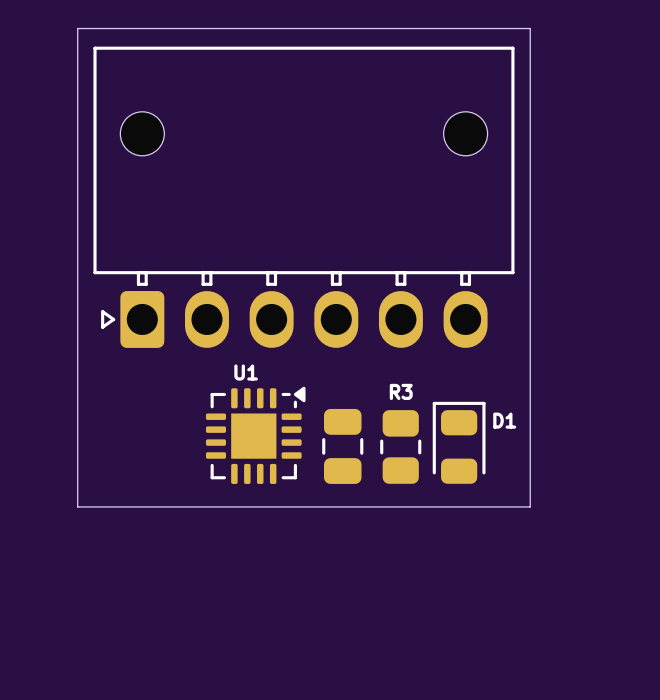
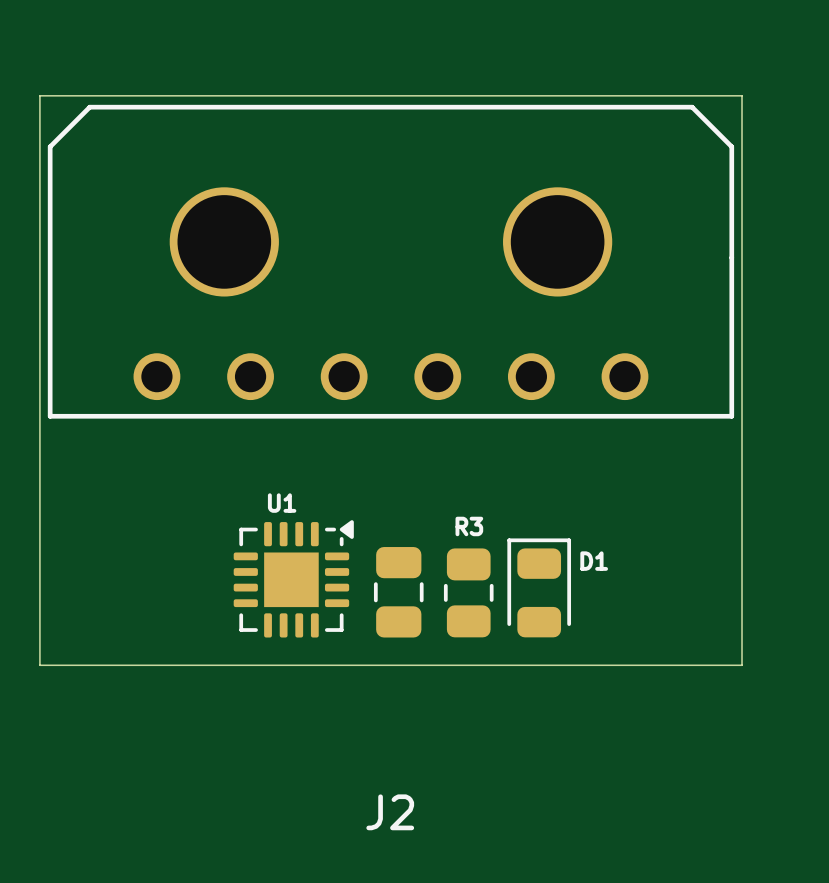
J2: none -> (390, 261)
part: (303, 197) -> none
board edge: (77, 506) (77, 28) (530, 28) (530, 506) -> (78, 665) (39, 665) (39, 95) (742, 95) (742, 665) (624, 665)

